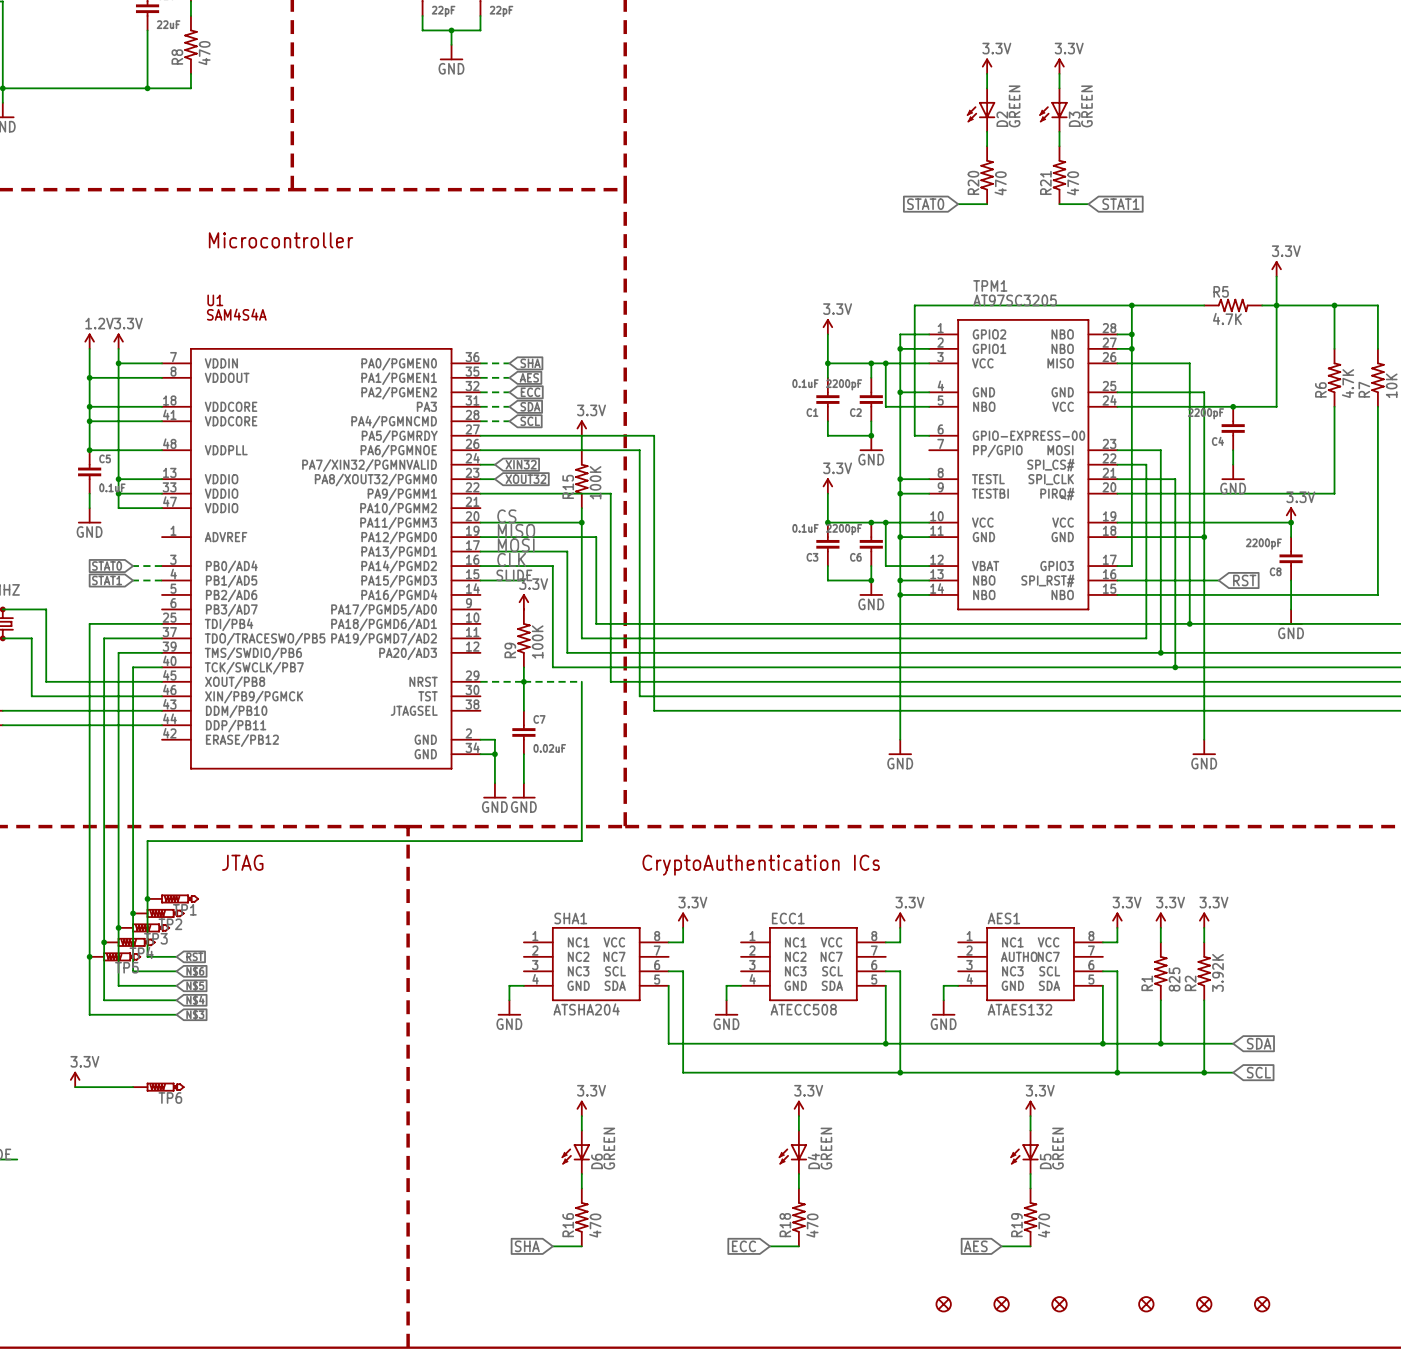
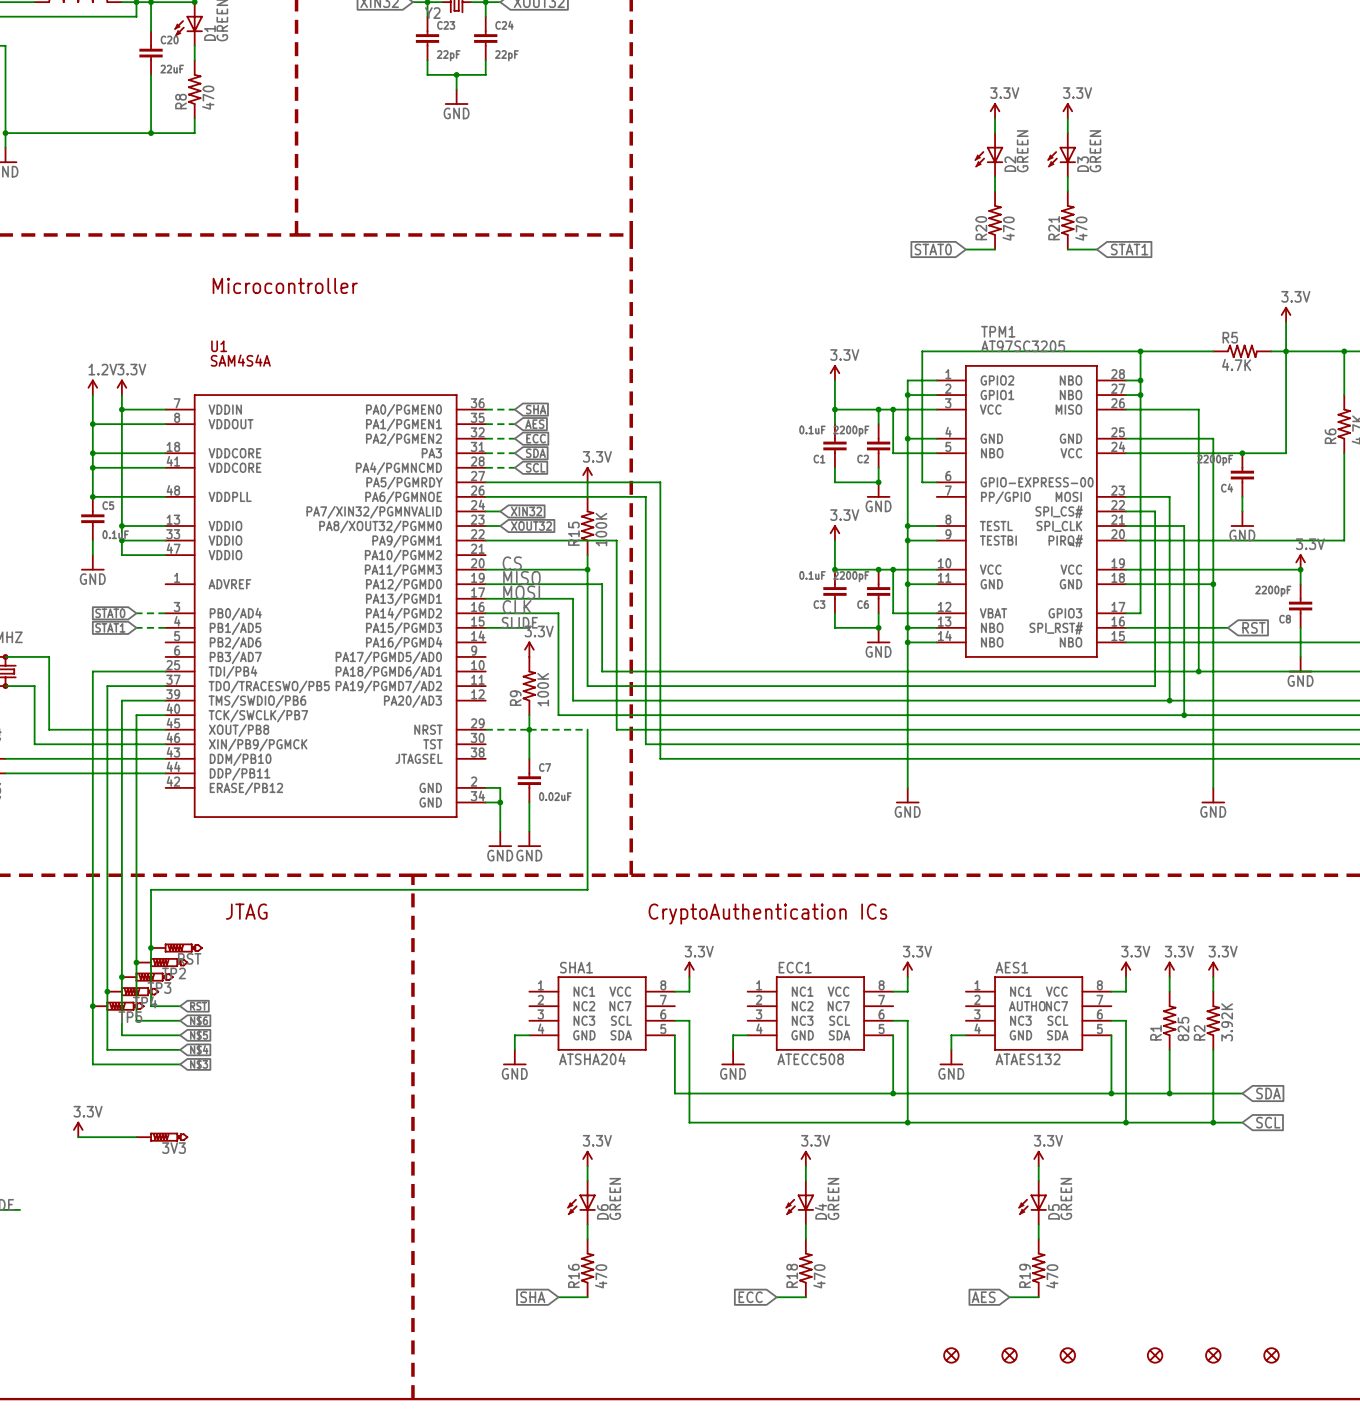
TP1 name: TP1 (184, 909) -> RST (189, 958)
TP6 name: TP6 (170, 1097) -> 3V3 (173, 1148)

